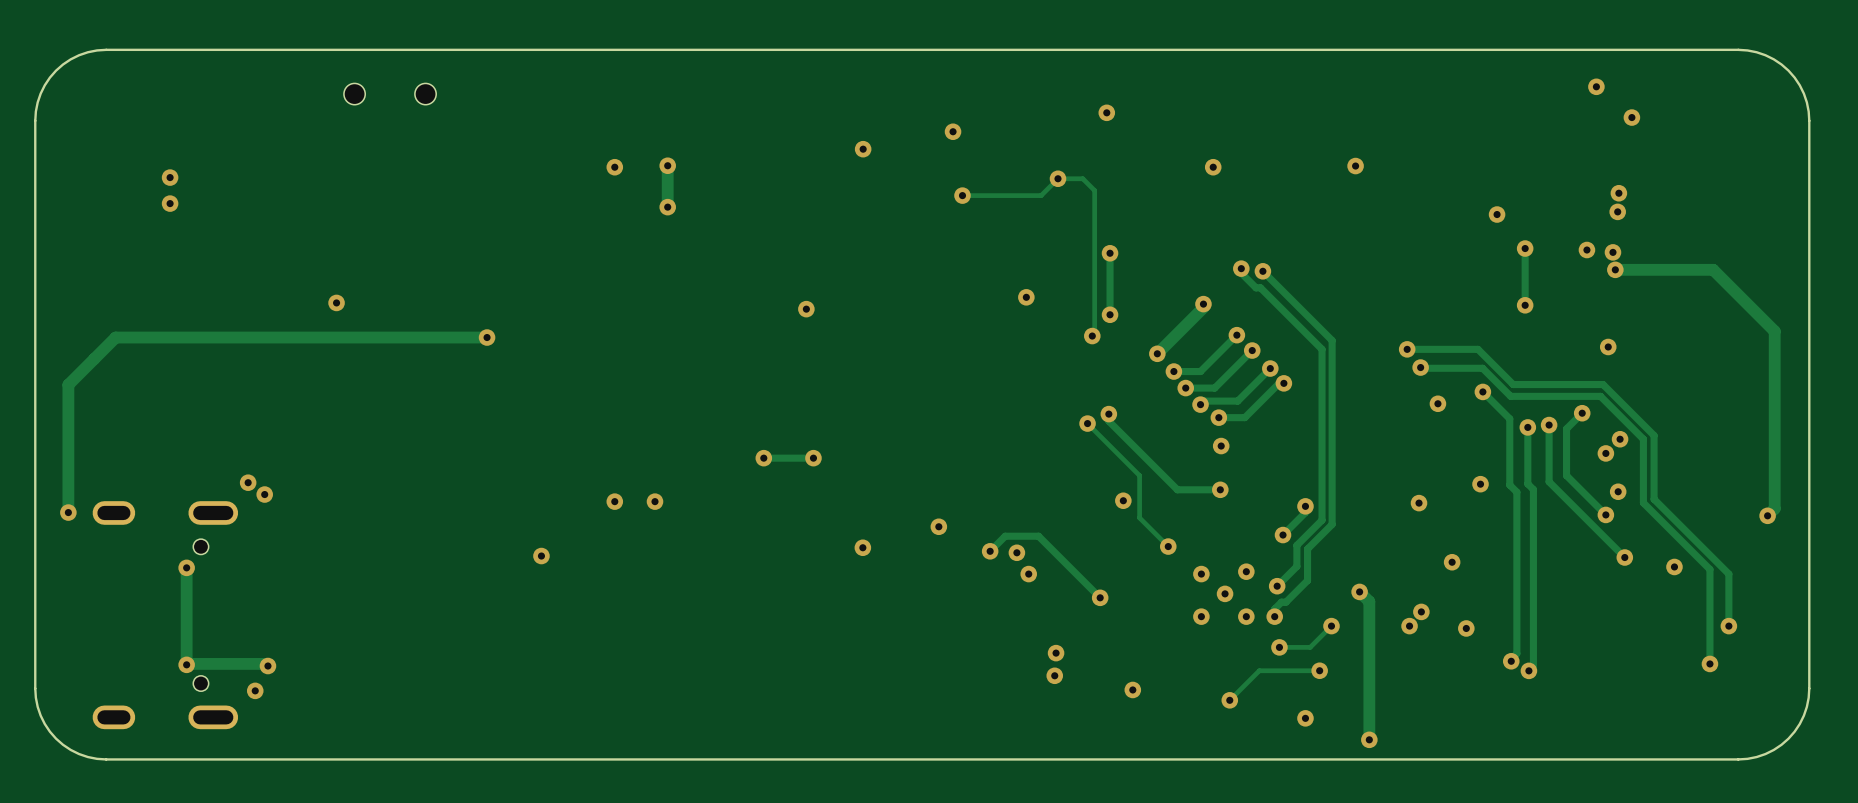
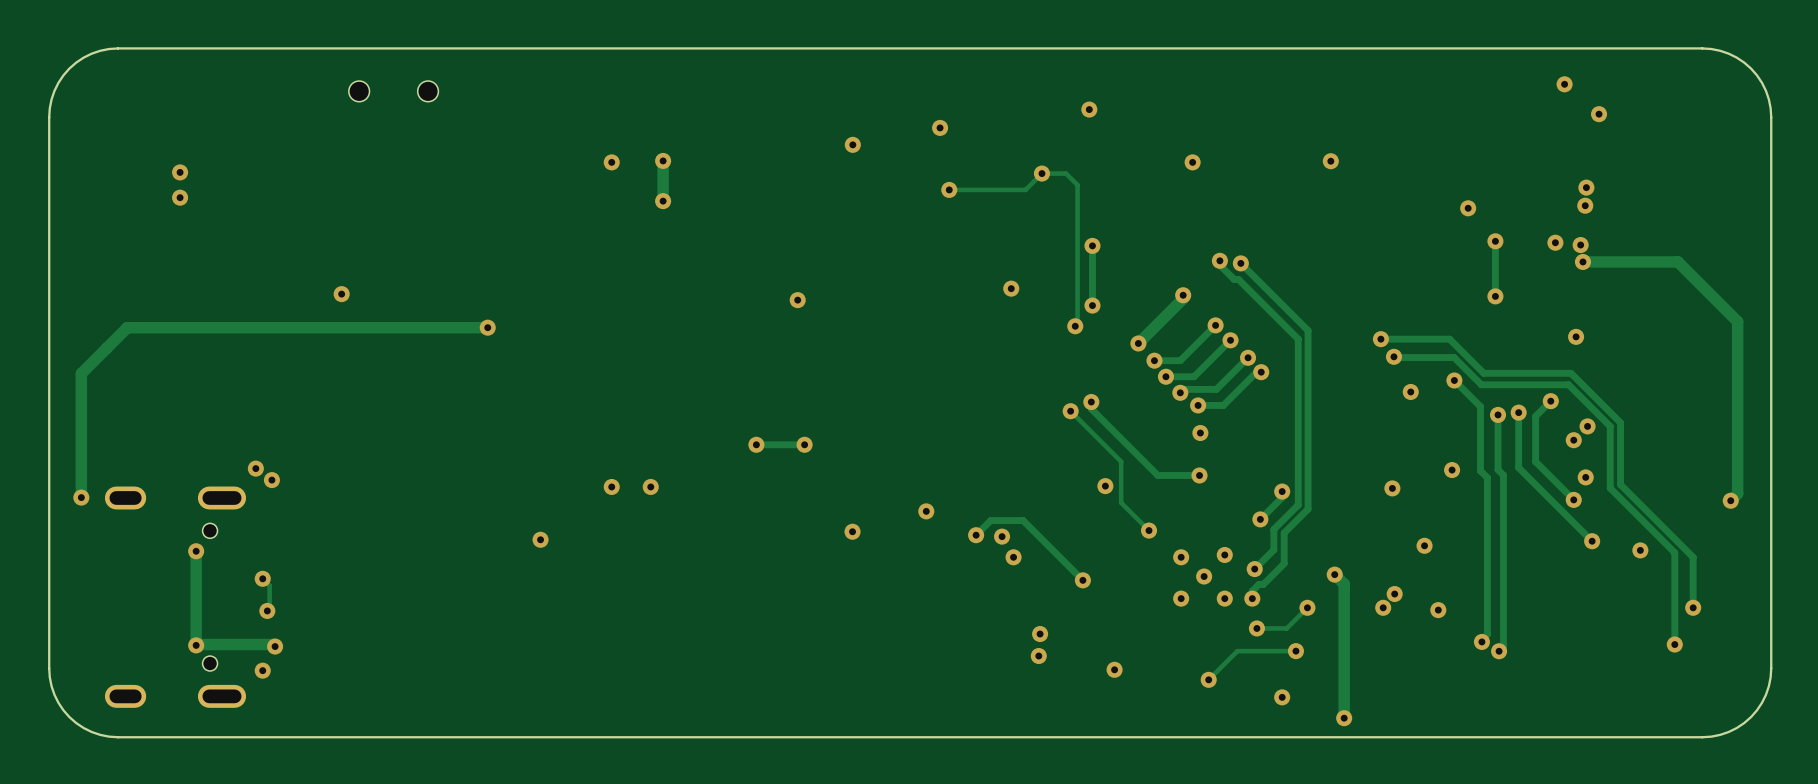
track: none -> (262, 578) (269, 585) (269, 608) (267, 610)
via: none -> (262, 578)
via: none -> (267, 610)

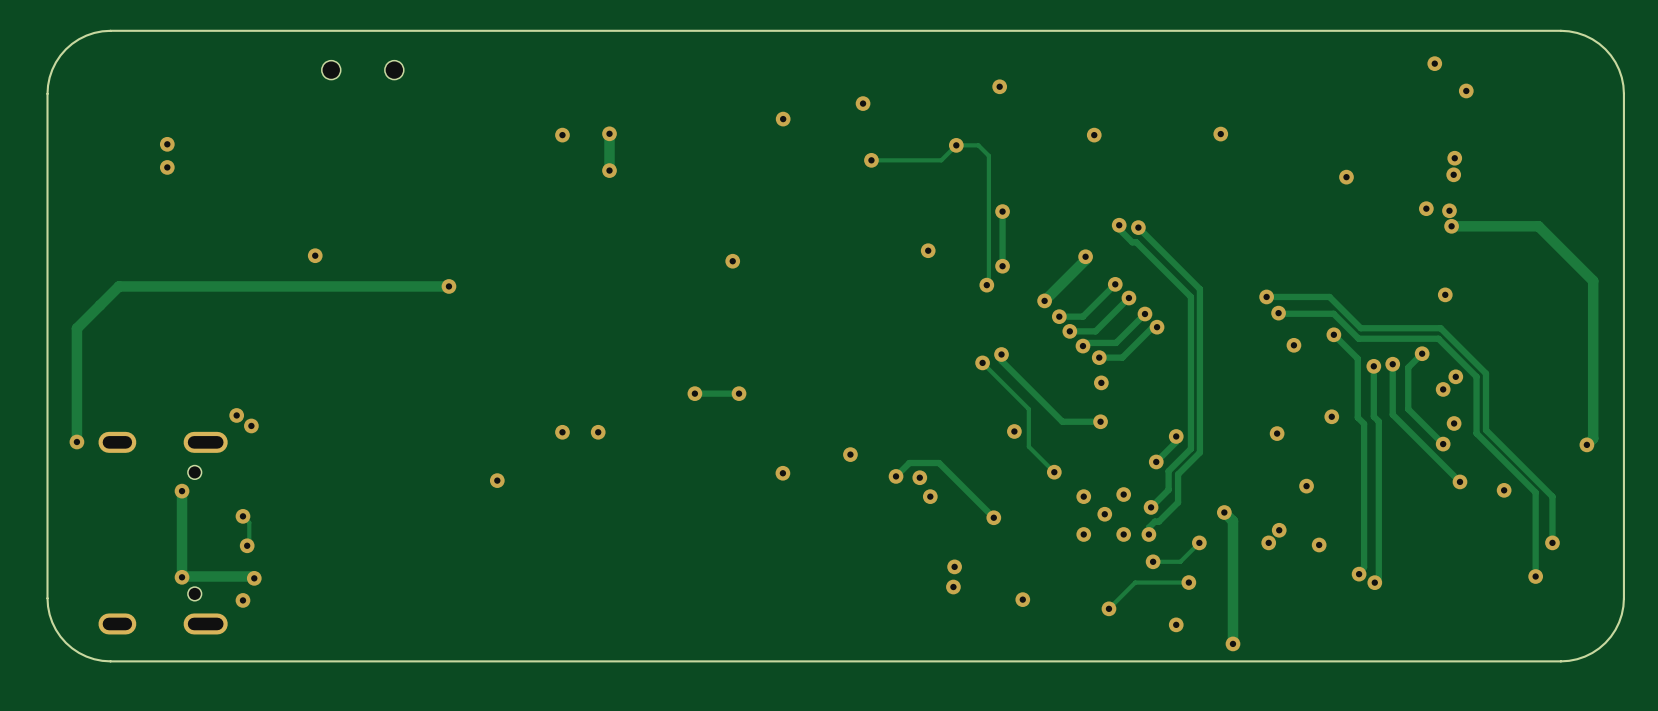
track: (1495, 241) (1495, 296) -> none
via: (1495, 241) -> none
via: (1495, 296) -> none

